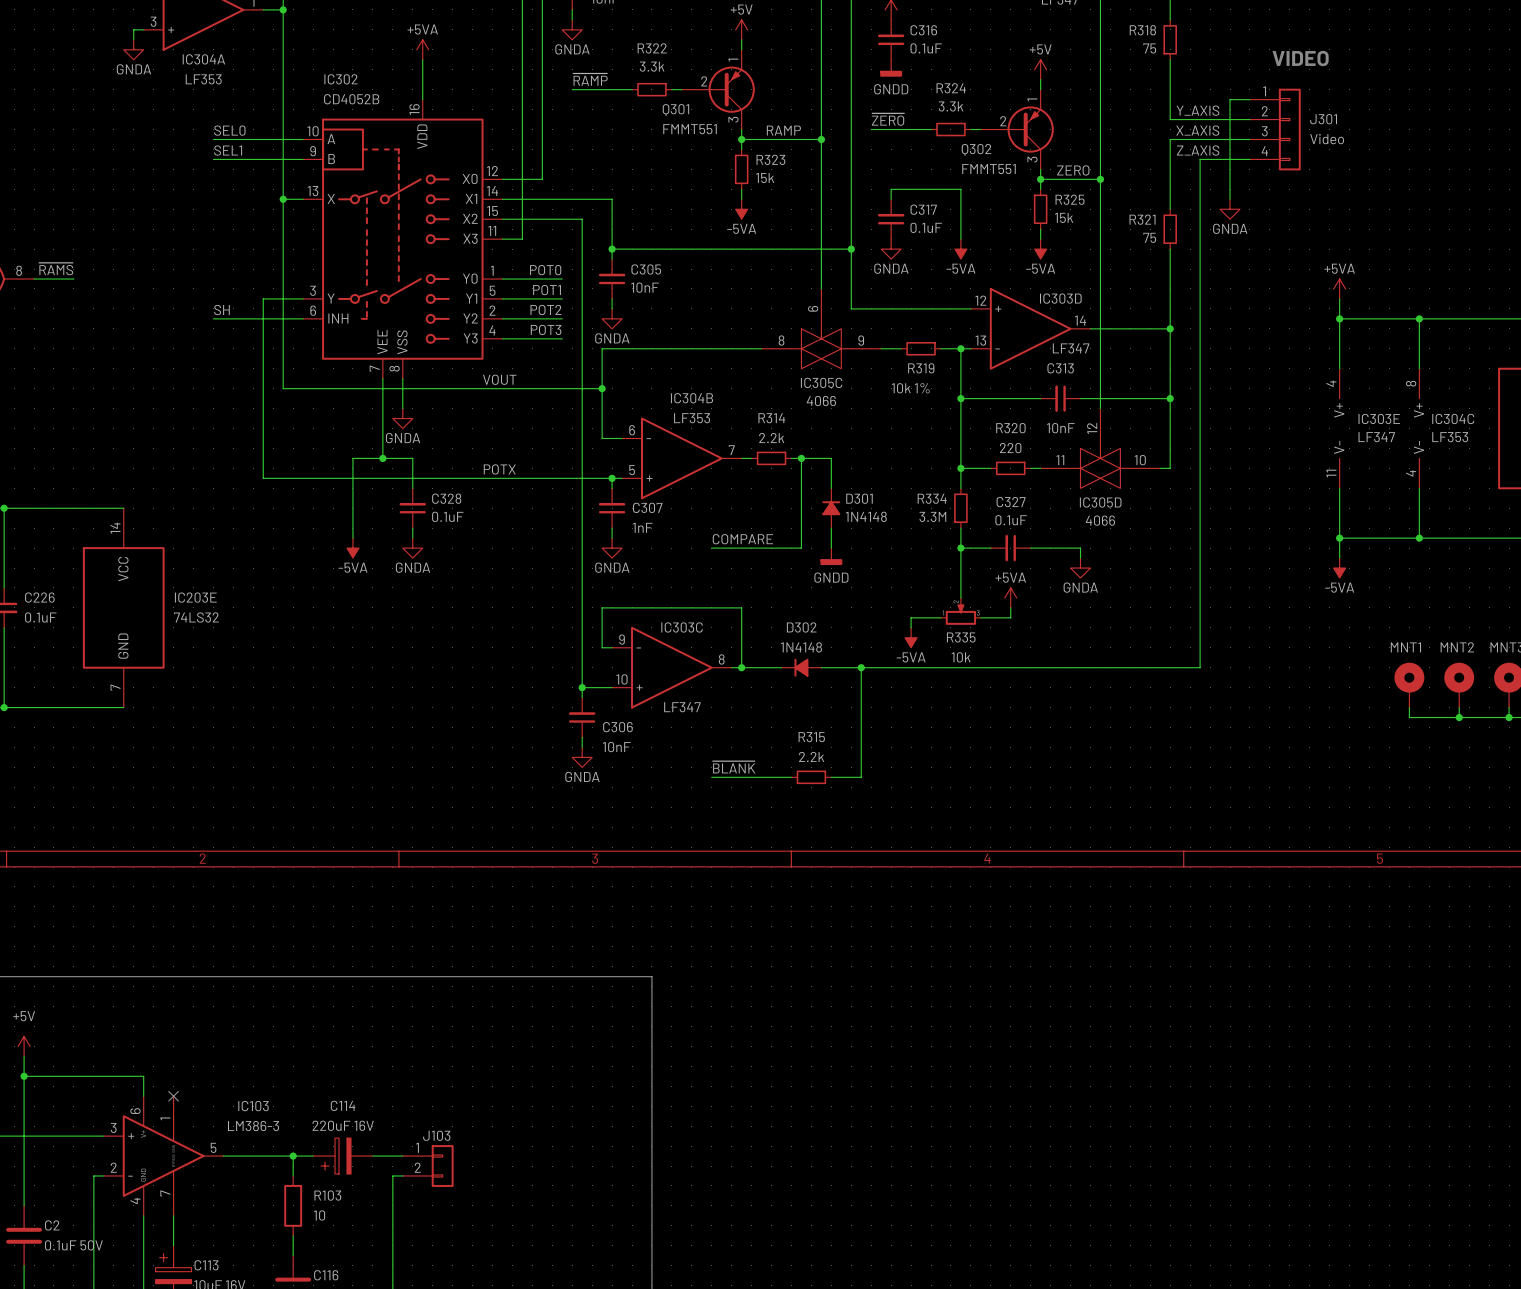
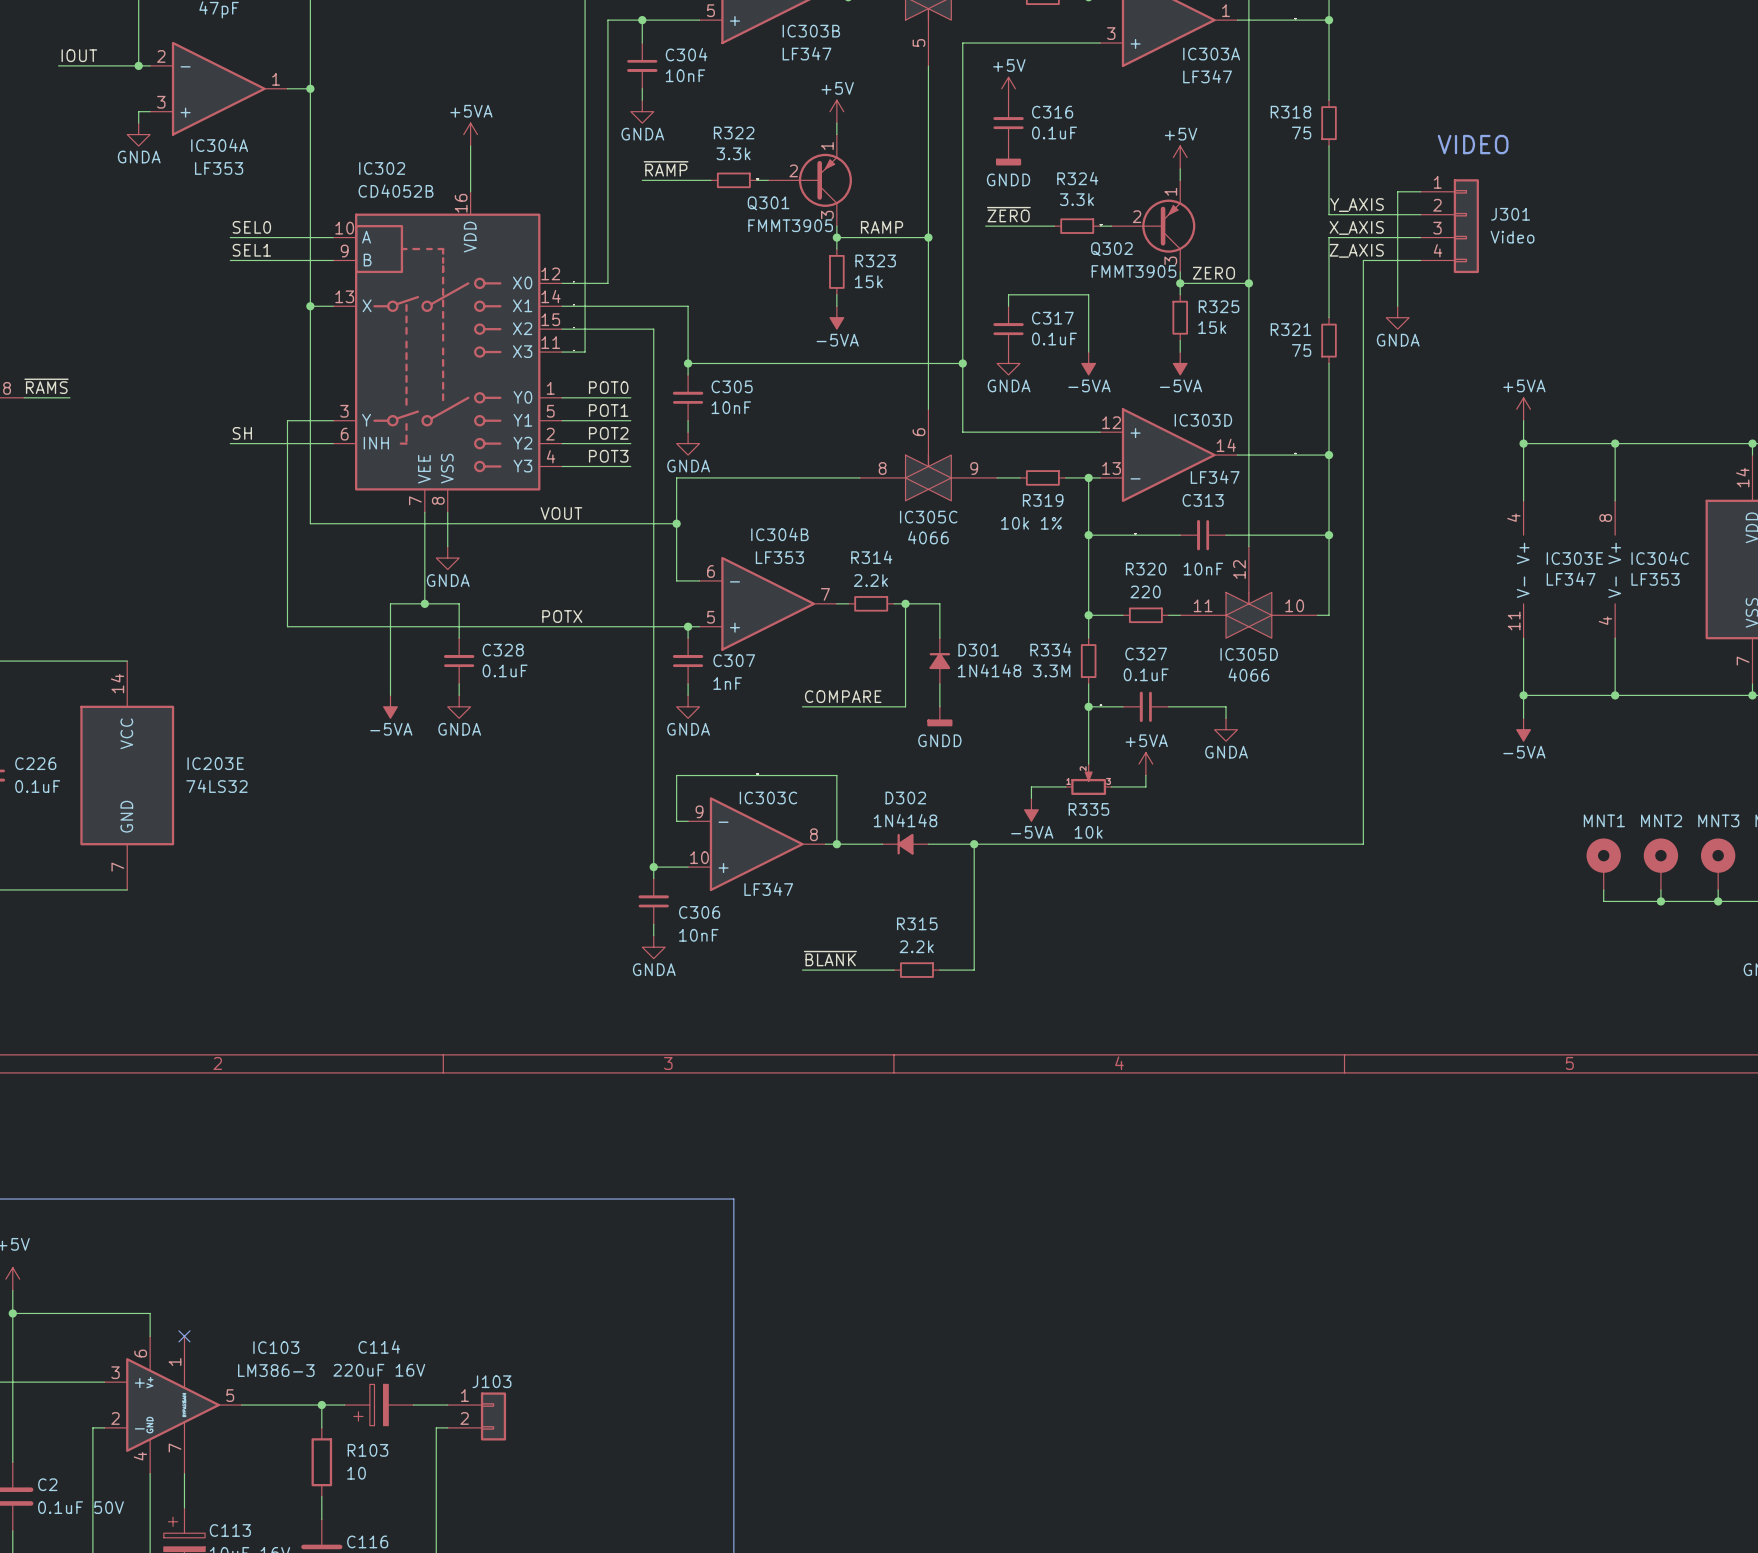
Q301 value: FMMT551 (690, 129) -> FMMT3905 (790, 225)
Q302 value: FMMT551 (989, 169) -> FMMT3905 (1133, 271)

